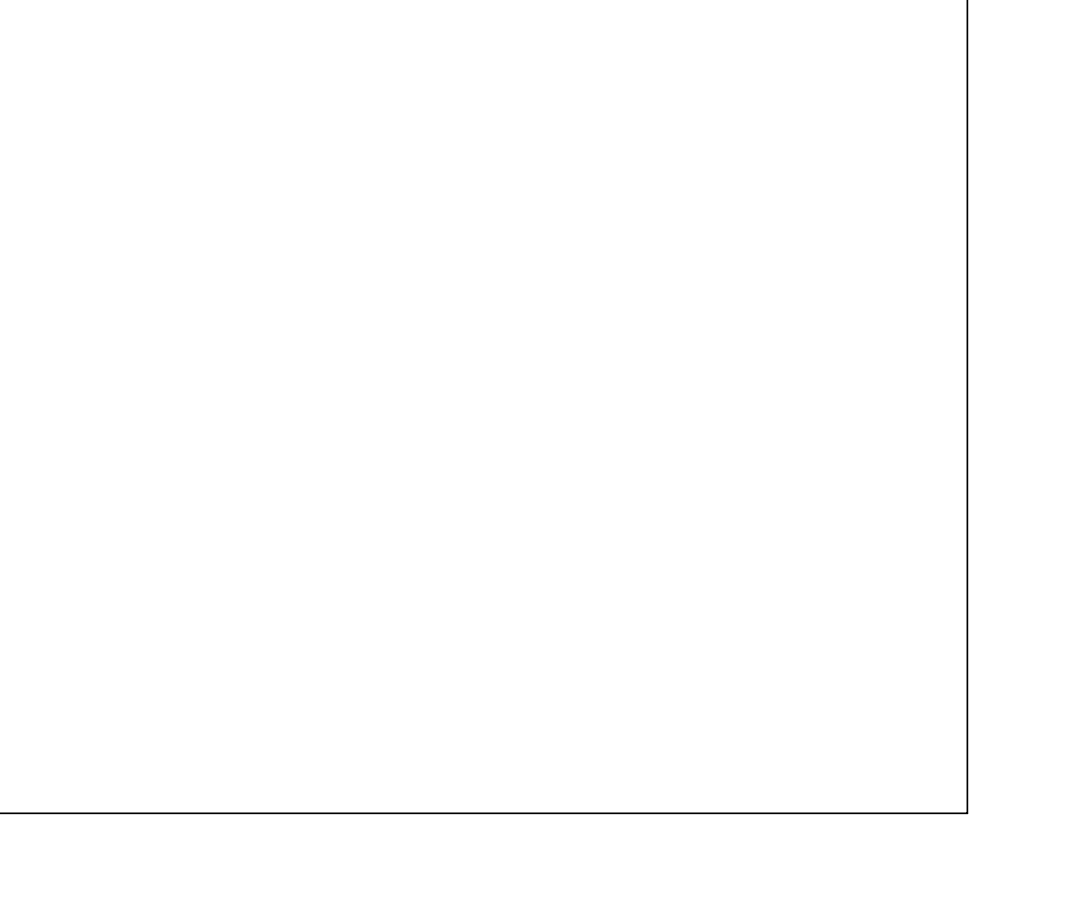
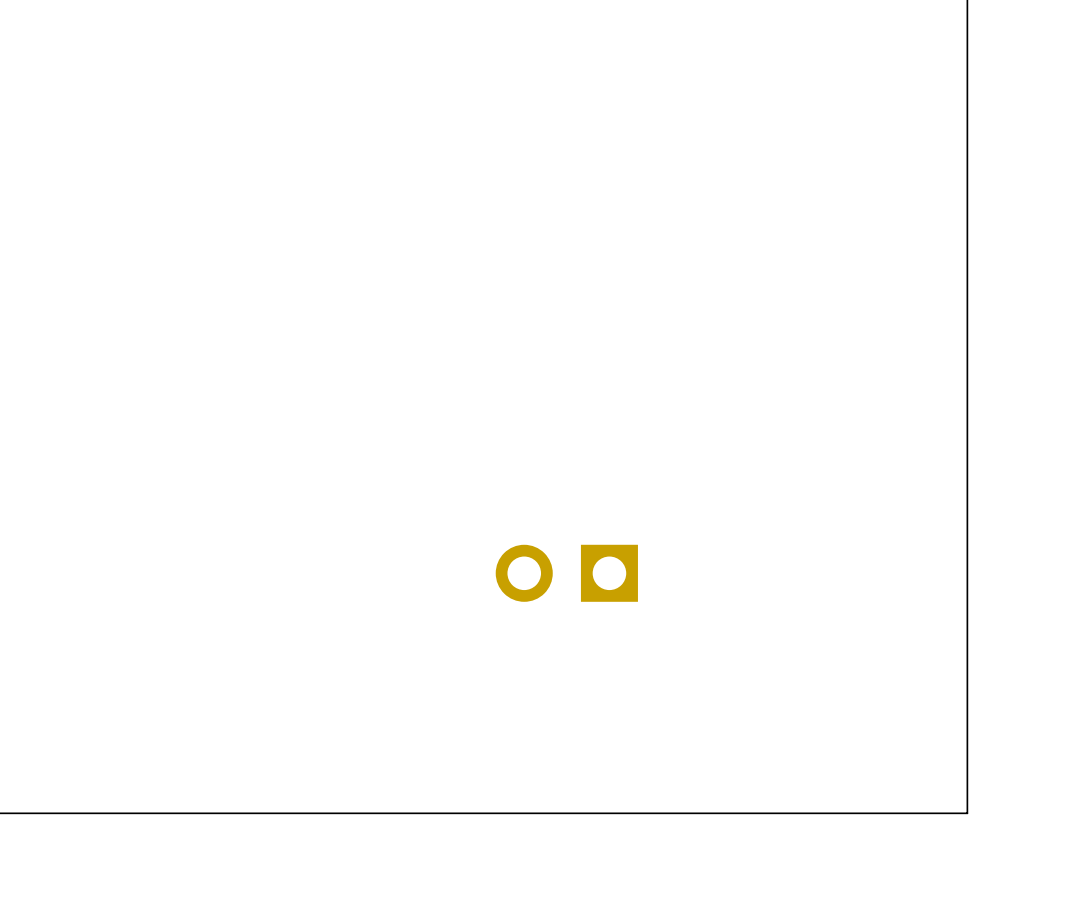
part: none -> (566, 573)

